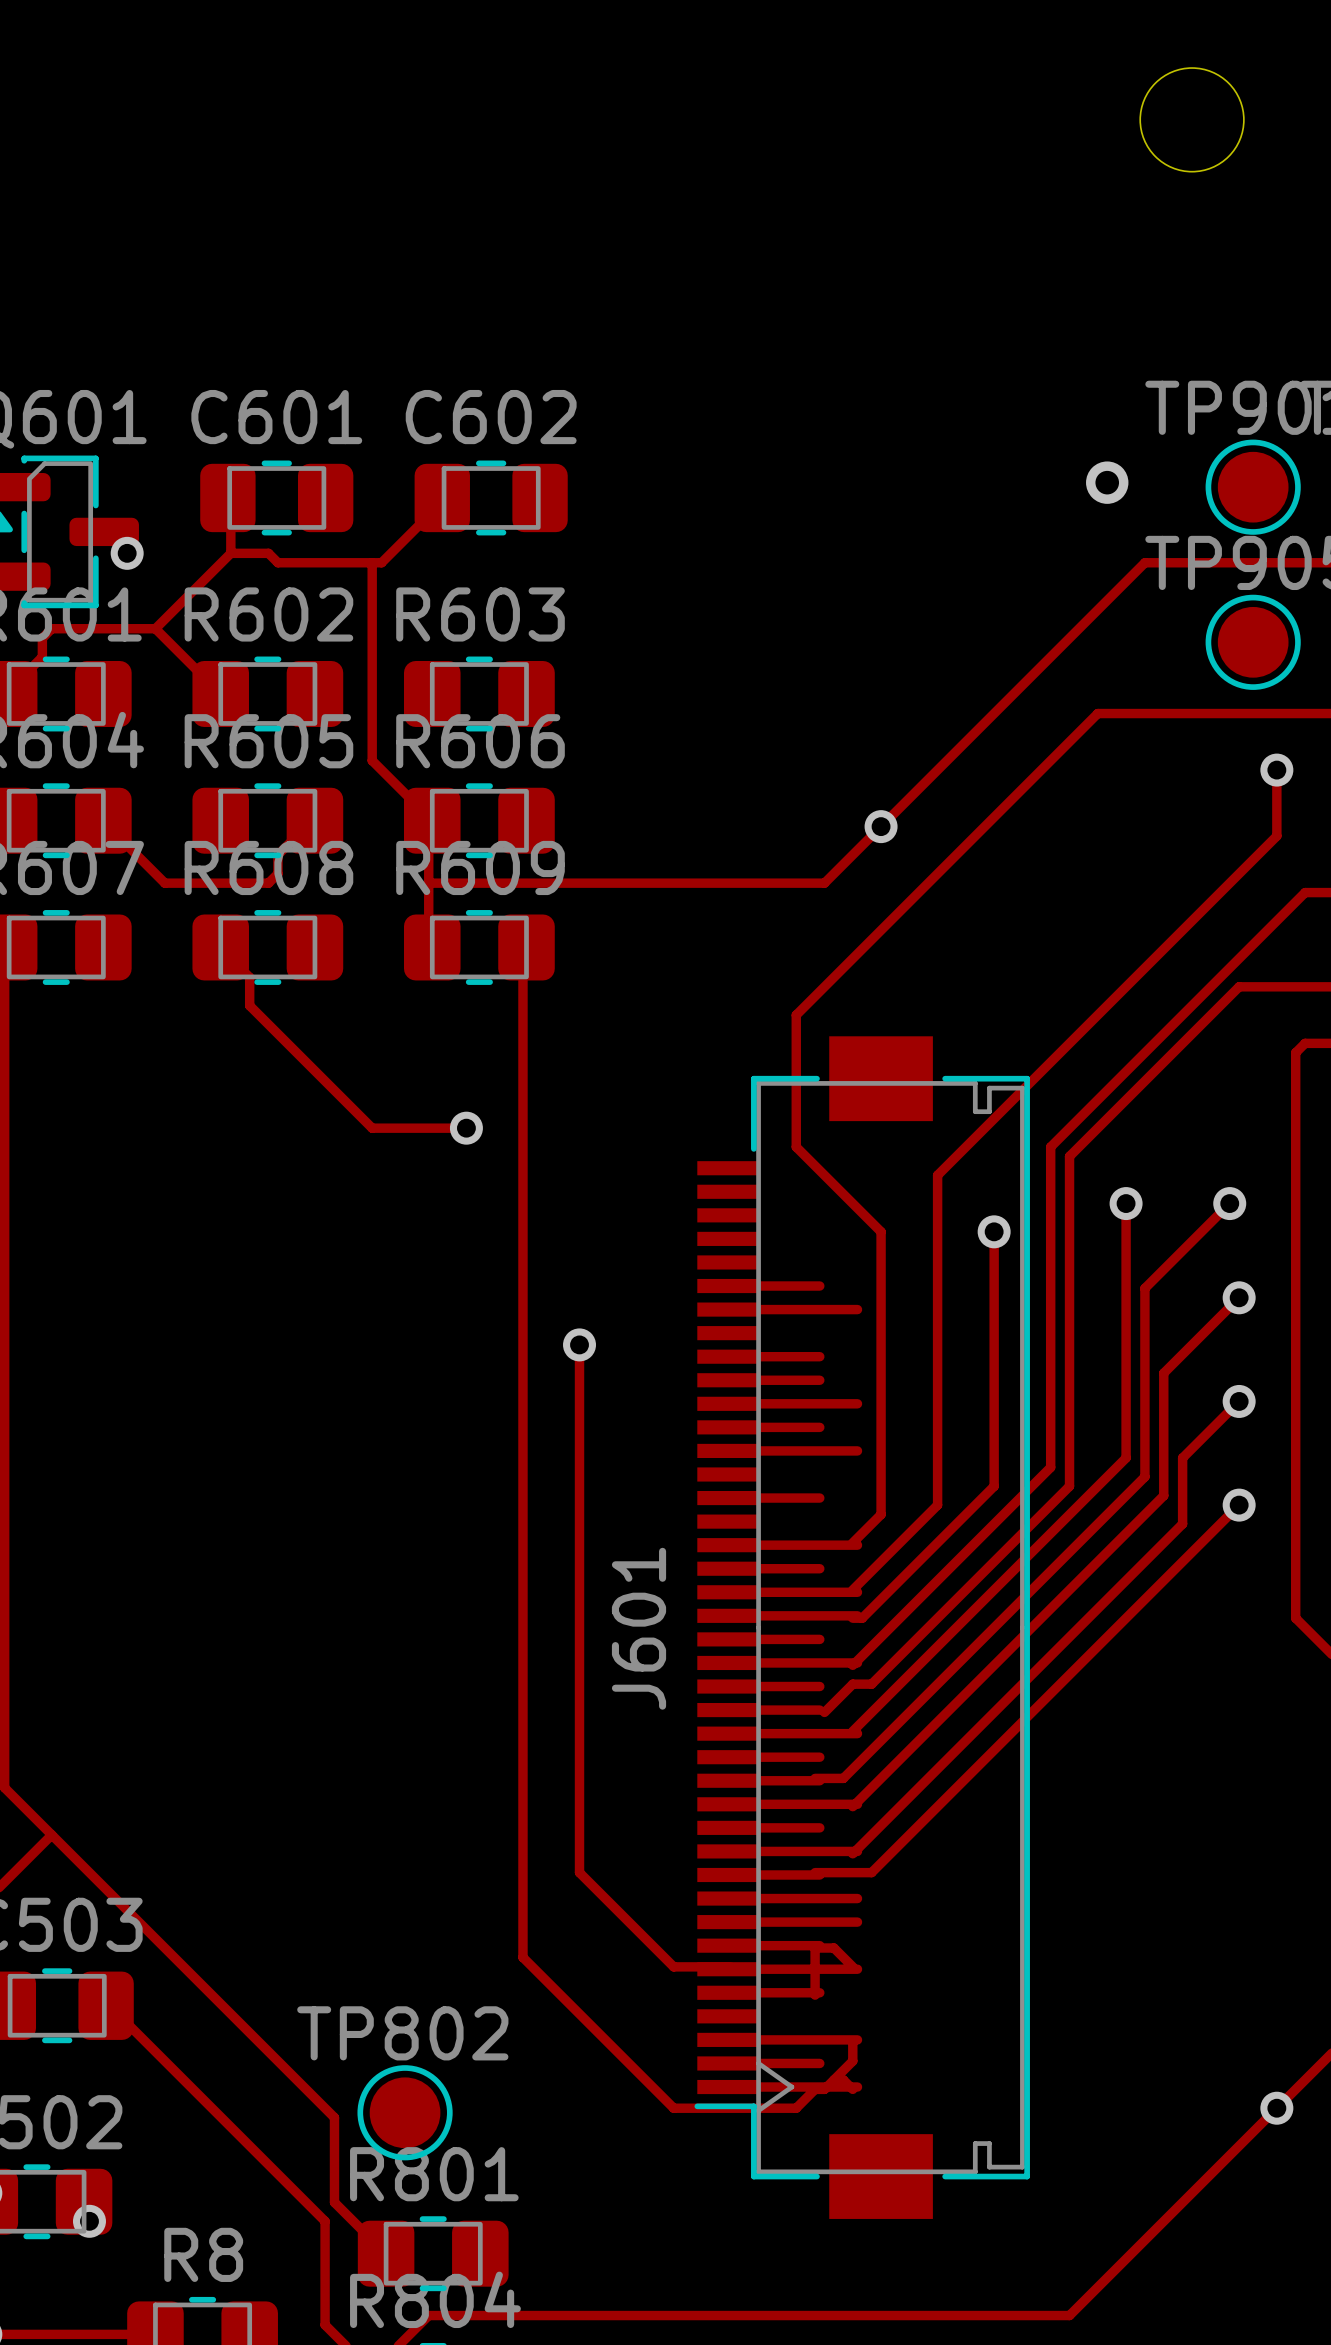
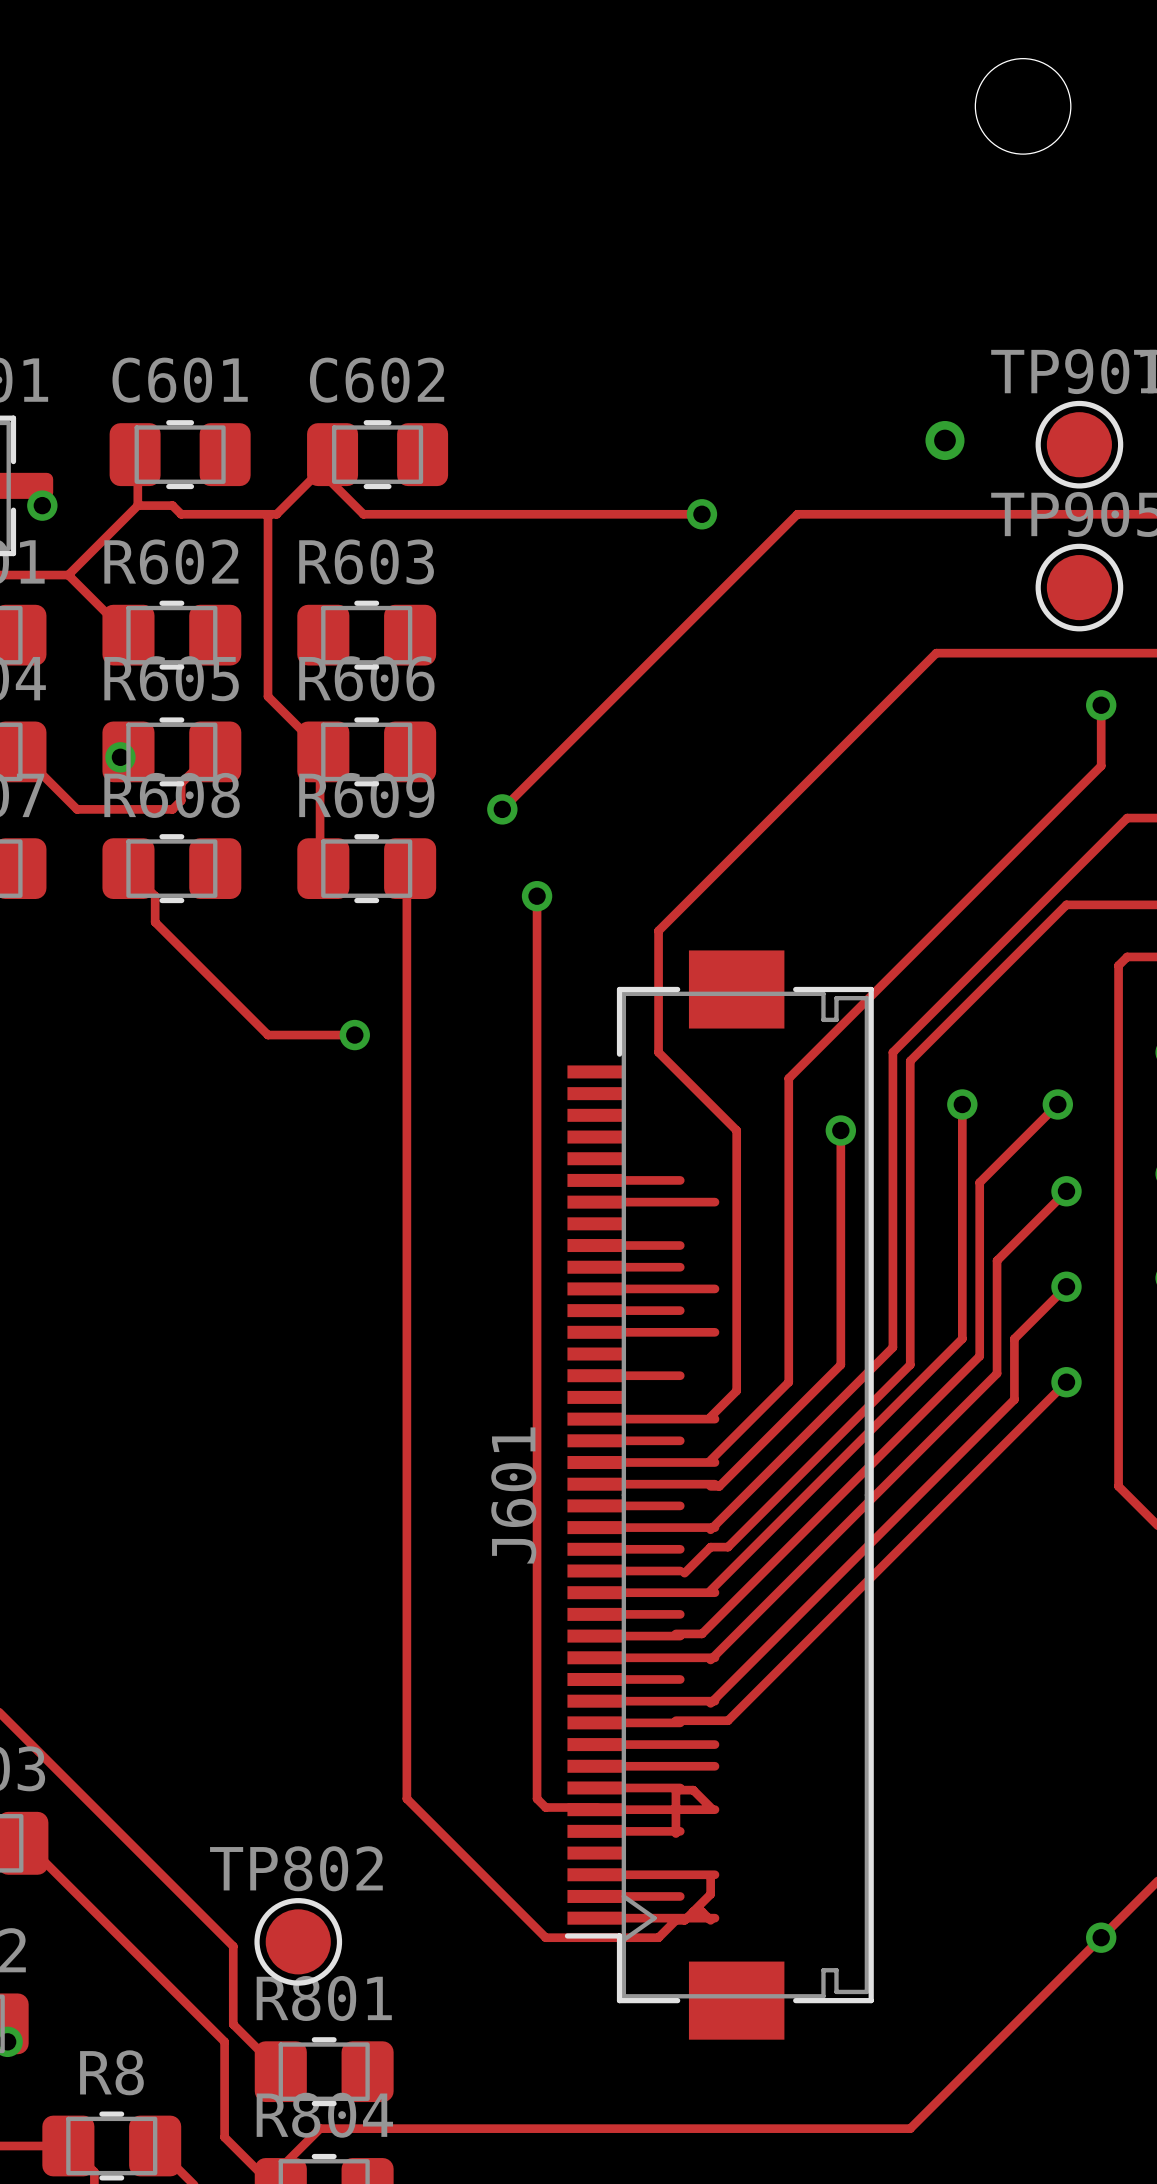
track: none -> (320, 470) (363, 514) (701, 514)
via: none -> (701, 514)
track: (1144, 562) (824, 883) (428, 883) -> (979, 514) (797, 514) (502, 809)
via: none -> (120, 757)
via: (881, 826) -> none
via: none -> (502, 809)
via: none -> (537, 896)
track: (579, 1344) (579, 1872) (664, 1957) -> (537, 896) (537, 1798)
via: (579, 1344) -> none

